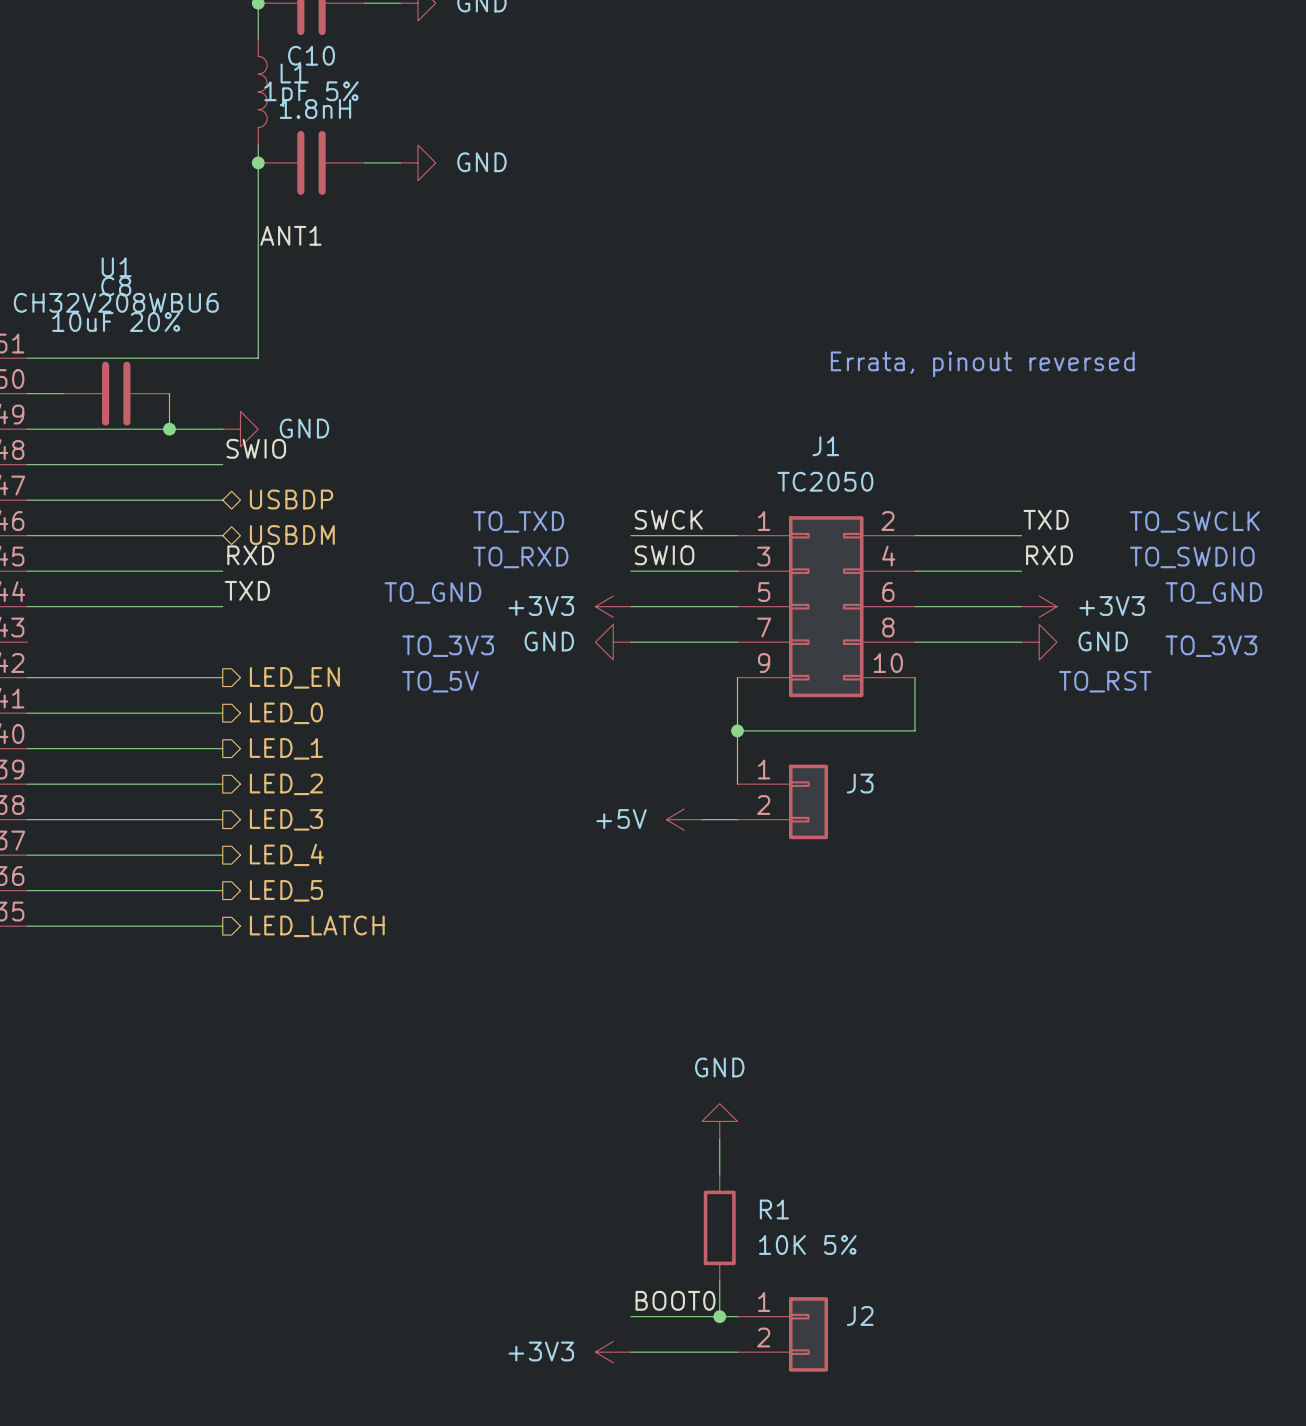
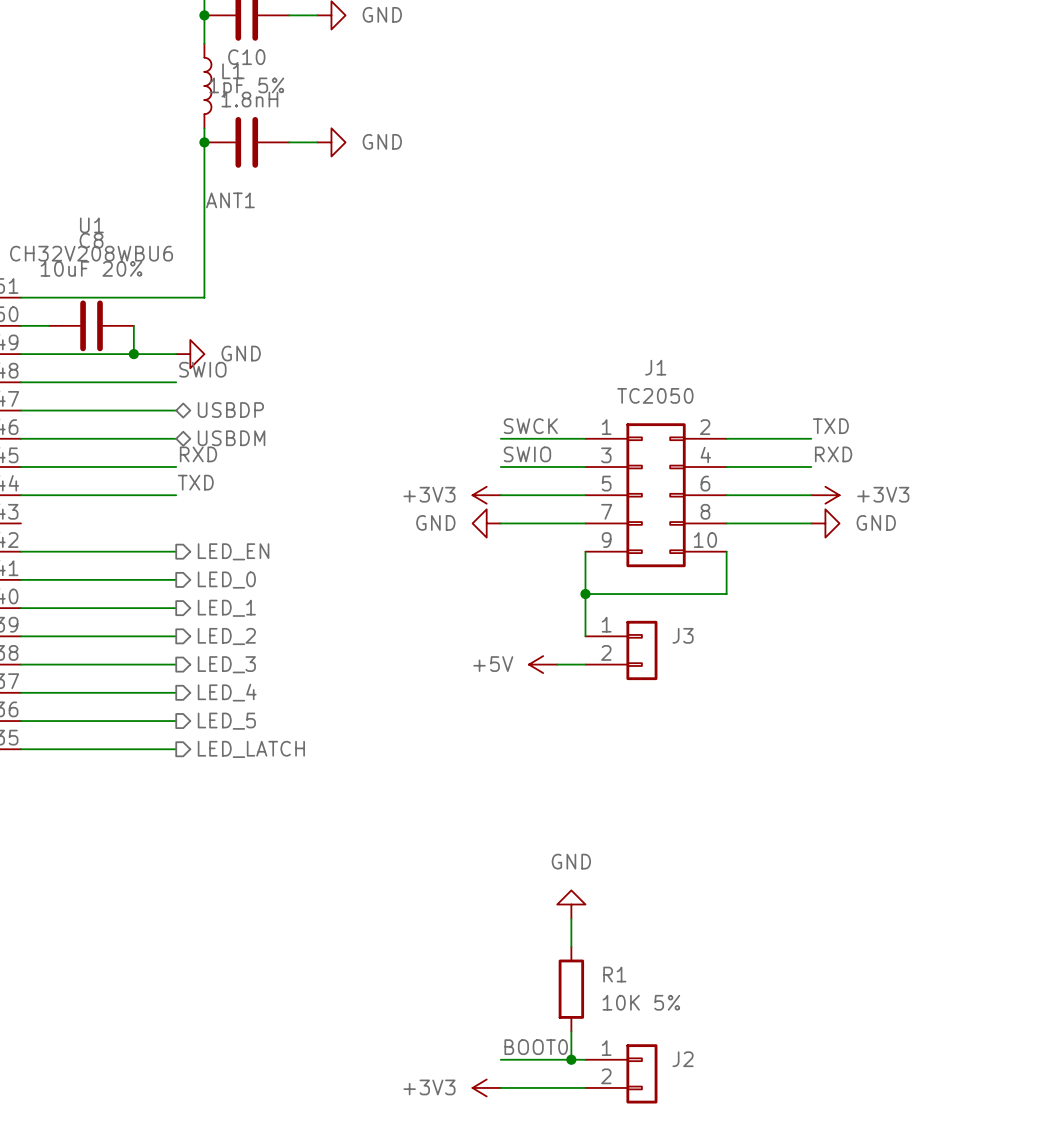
text: Errata, pinout reversed (982, 364) -> none
text: TO_TXD (518, 521) -> none
text: TO_SWCLK (1194, 521) -> none
text: TO_RXD (520, 557) -> none
text: TO_SWDIO (1192, 557) -> none
text: TO_GND (432, 592) -> none
text: TO_GND (1213, 592) -> none
text: TO_3V3 (448, 646) -> none
text: TO_3V3 (1211, 646) -> none
text: TO_5V (440, 681) -> none
text: TO_RST (1105, 681) -> none

